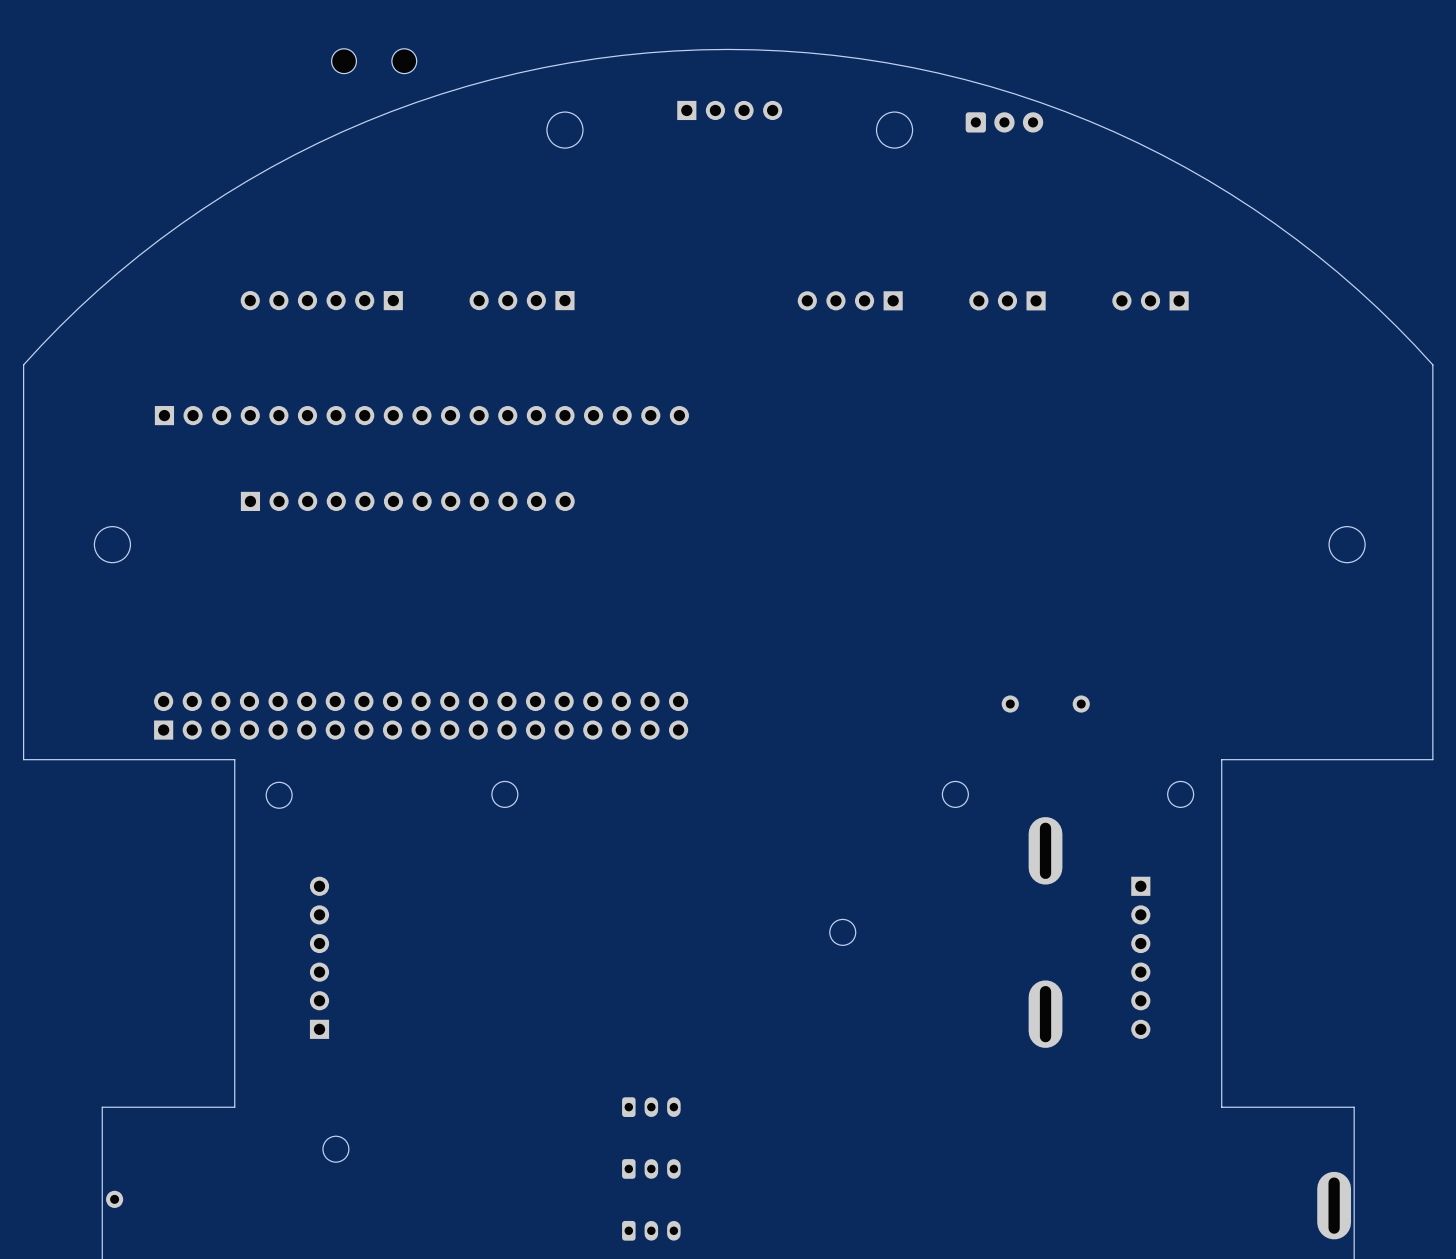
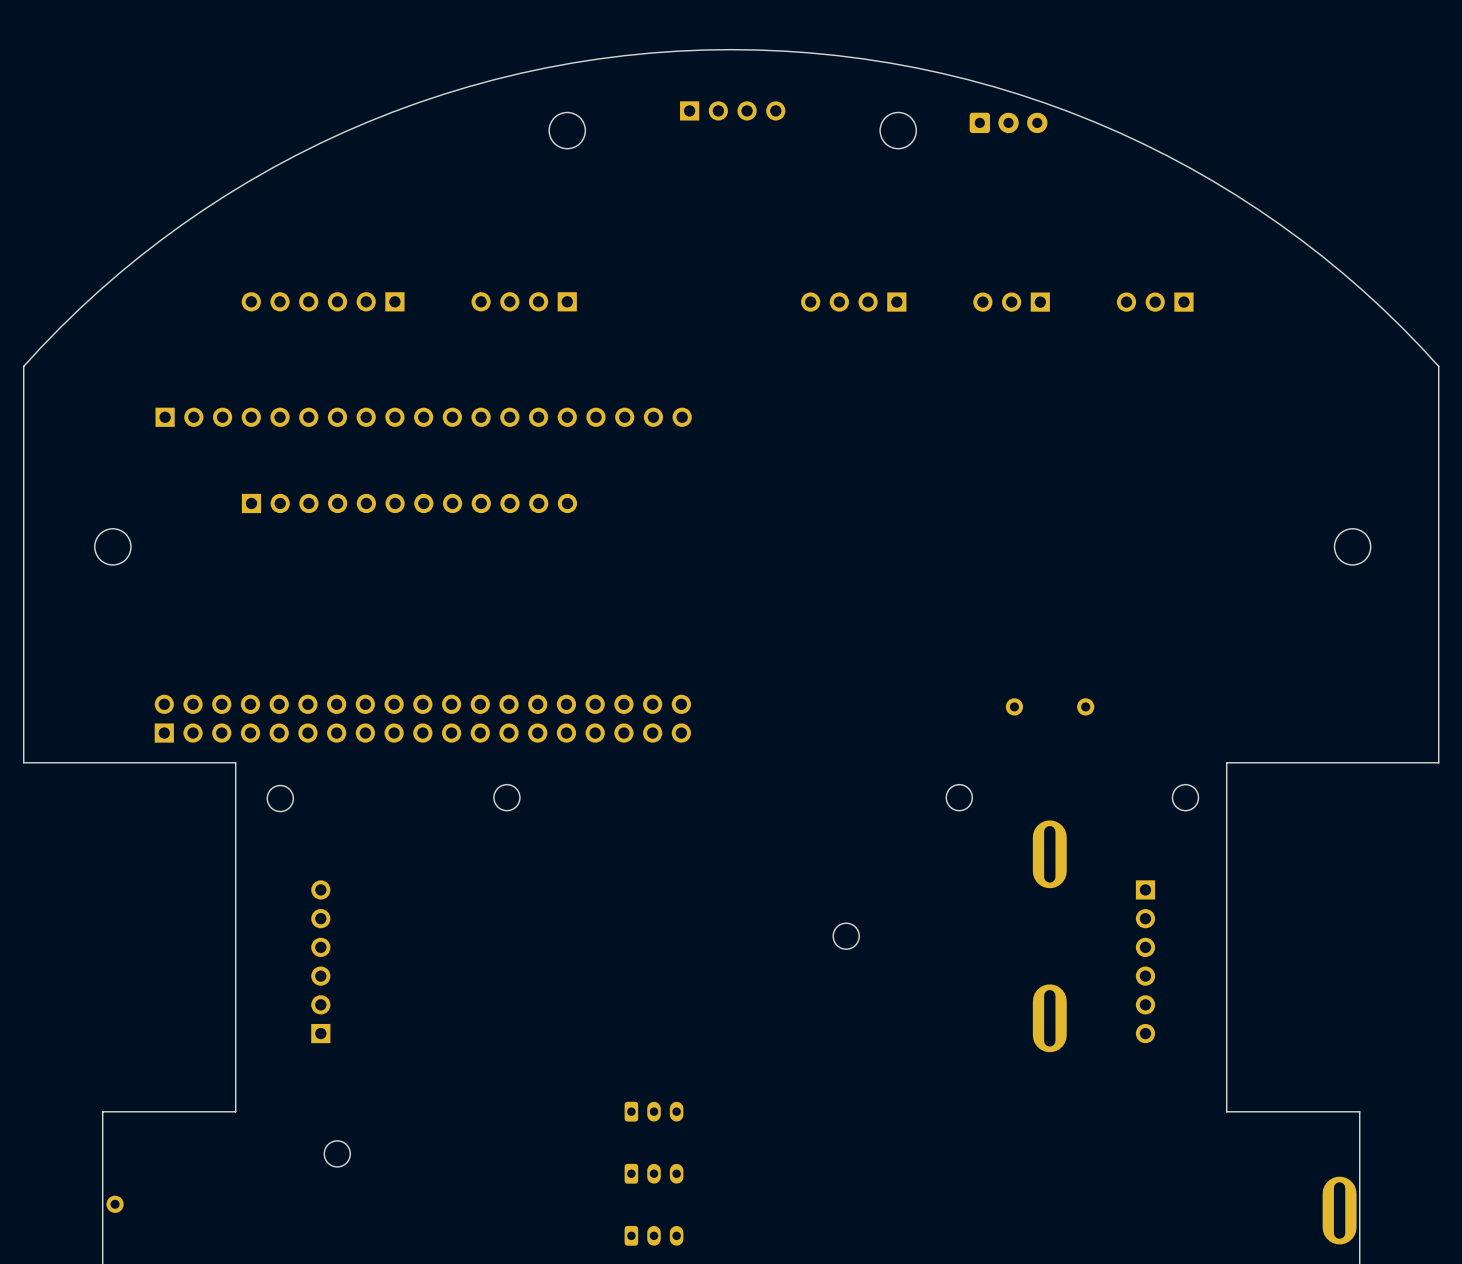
part: (344, 61) -> none
part: (404, 61) -> none

